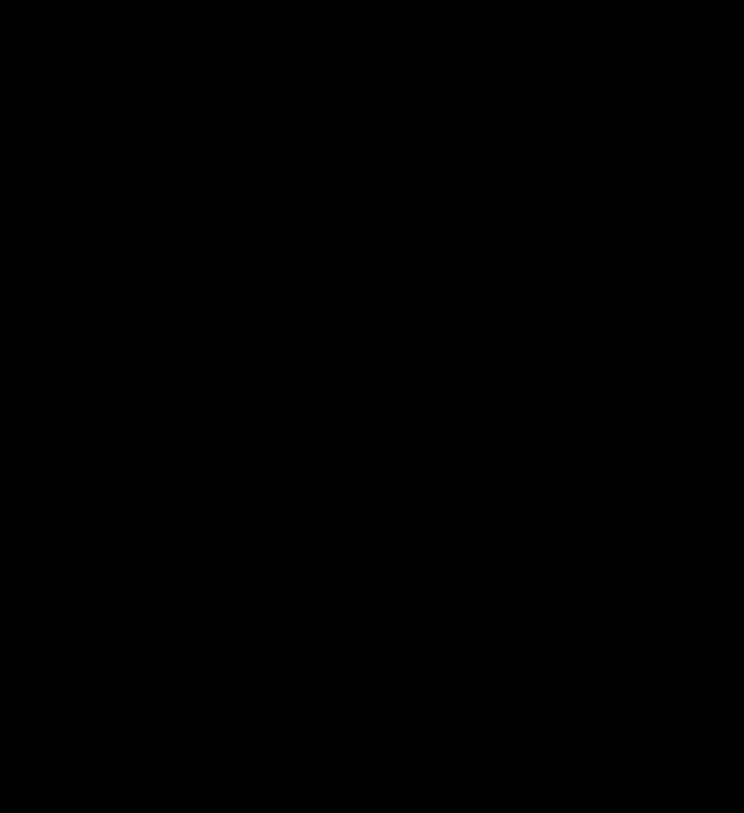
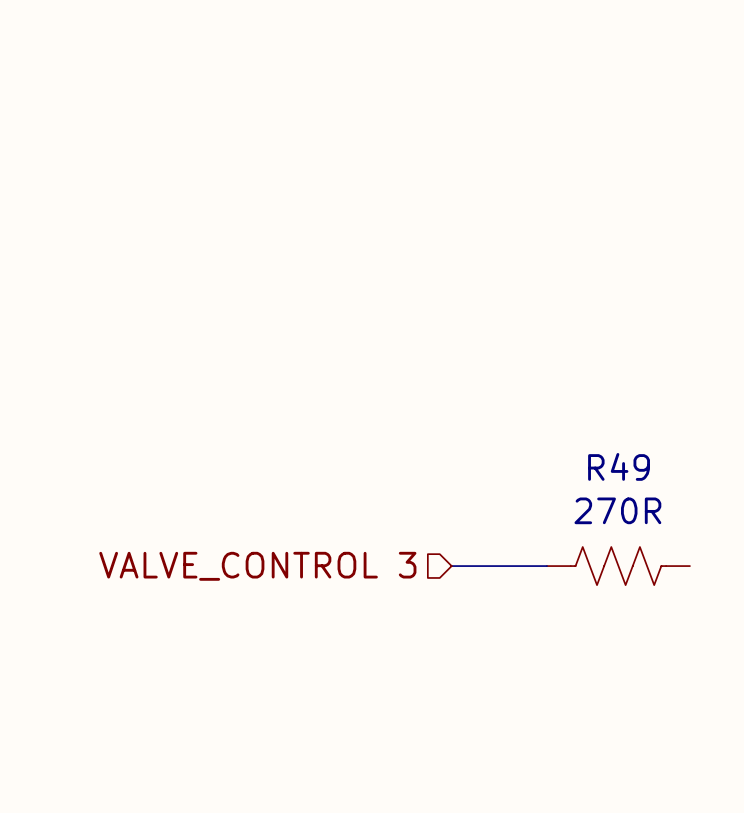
hierarchical label: none -> VALVE_CONTROL 3 (257, 566)
wire: none -> (451, 566) (546, 566)
R49: none -> 270R (618, 566)

